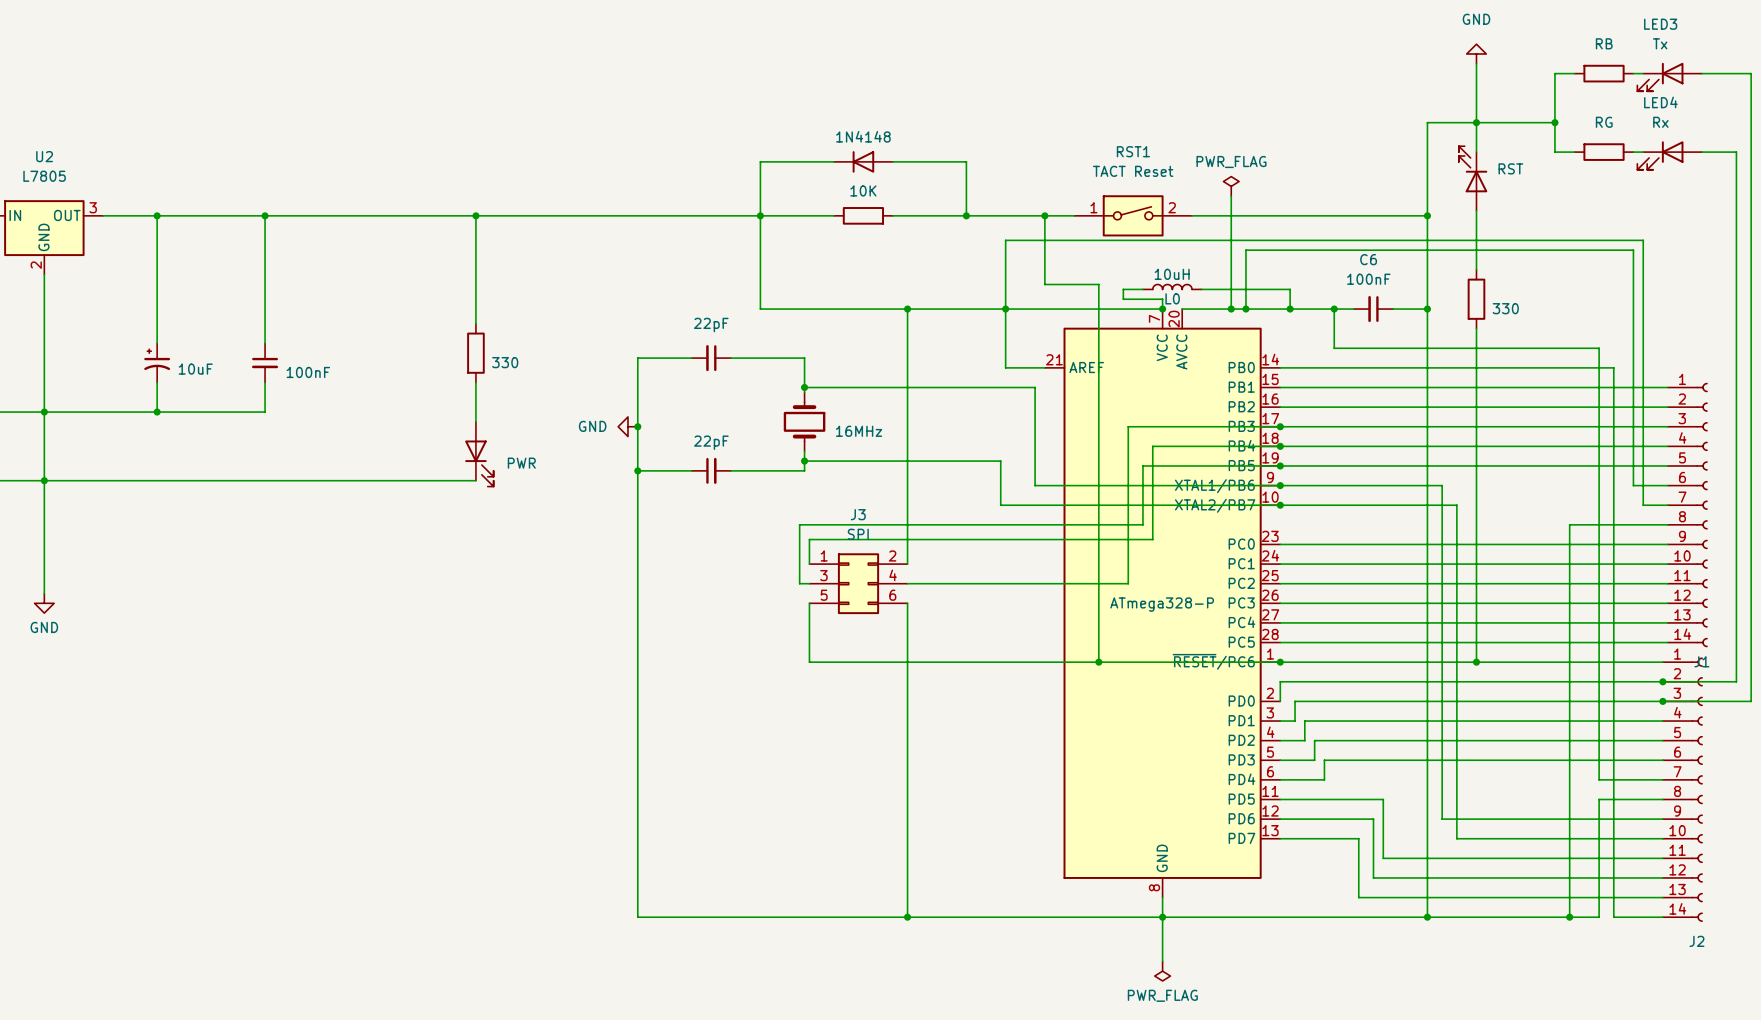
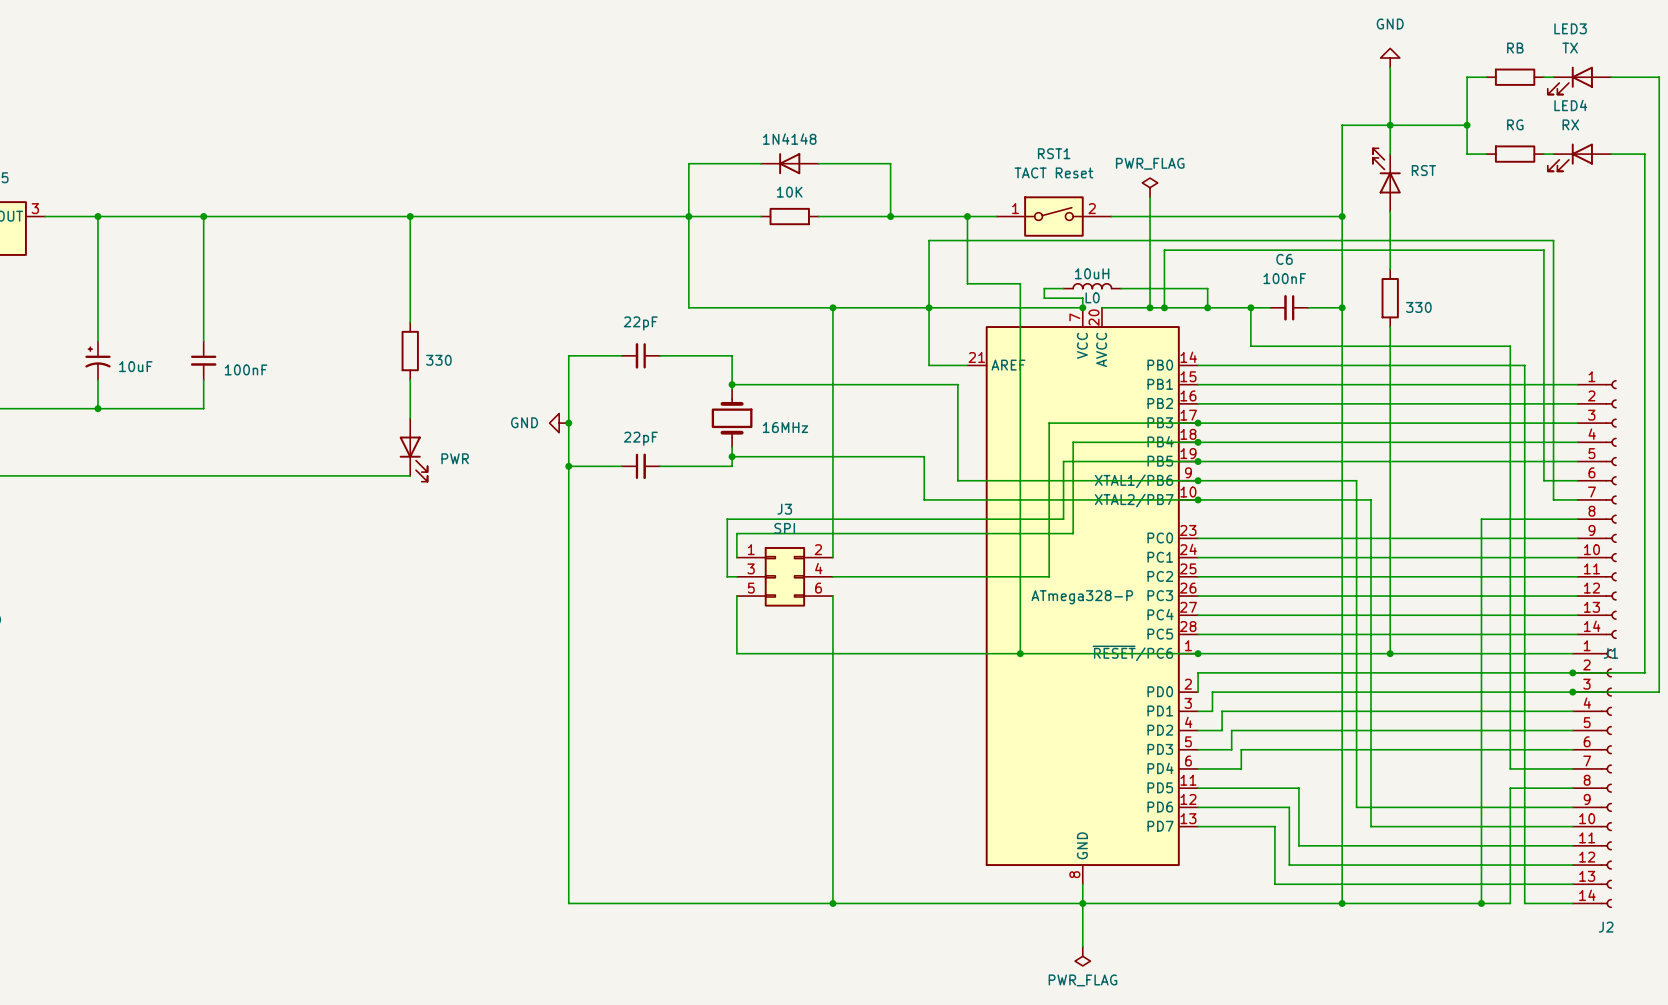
LED3 value: Tx (1660, 43) -> TX (1570, 48)
LED4 value: Rx (1660, 122) -> RX (1570, 124)

